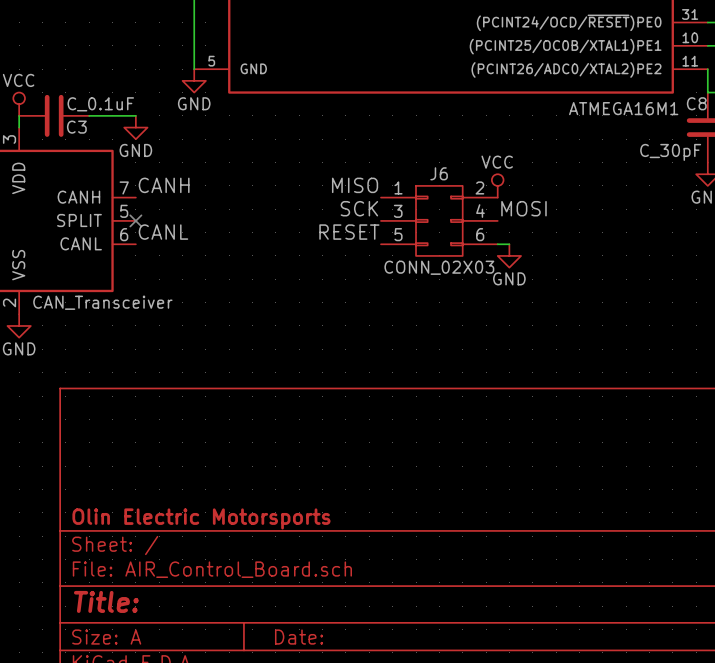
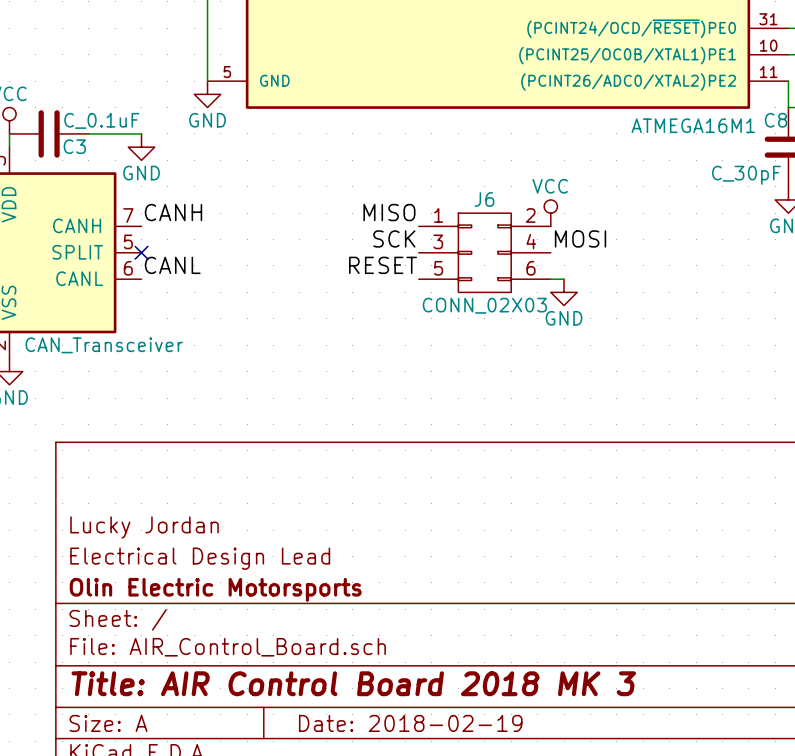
title block: none -> Lucky Jordan (144, 527)
title block: none -> Electrical Design Lead (200, 558)
title block: Title: (106, 601) -> Title: AIR Control Board 2018 MK 3 (353, 683)
title block: Date: (299, 637) -> Date: 2018-02-19 (410, 723)

